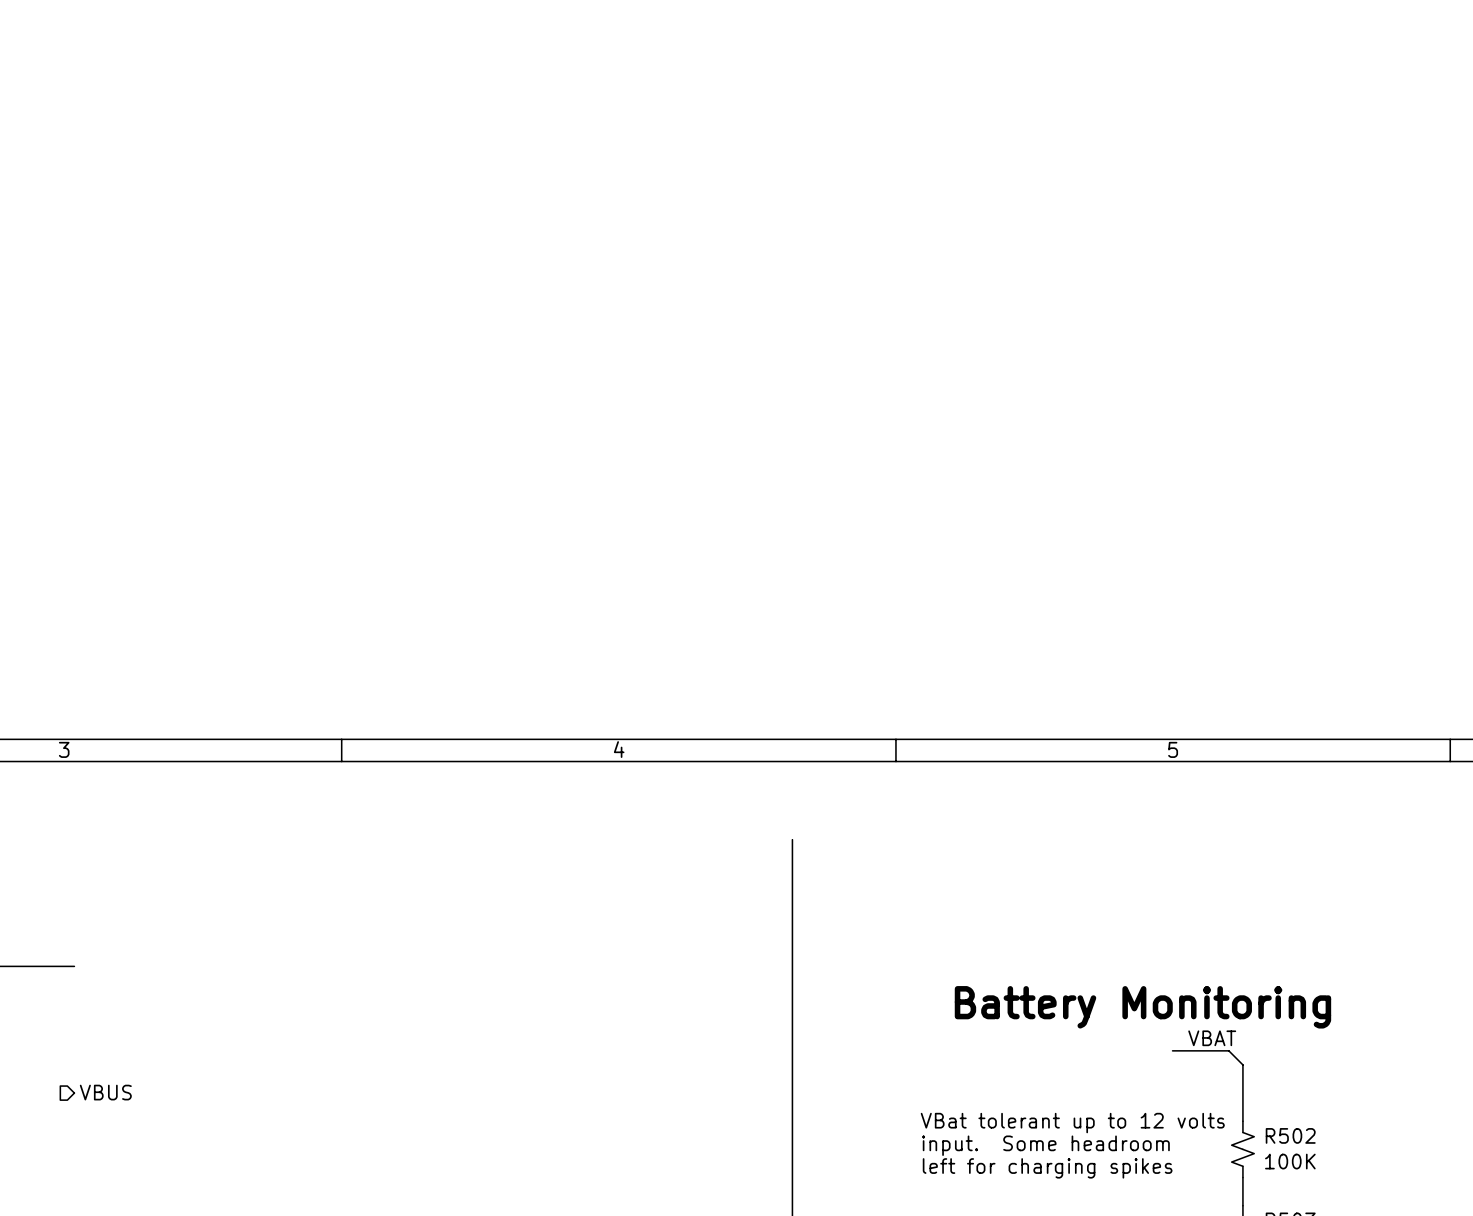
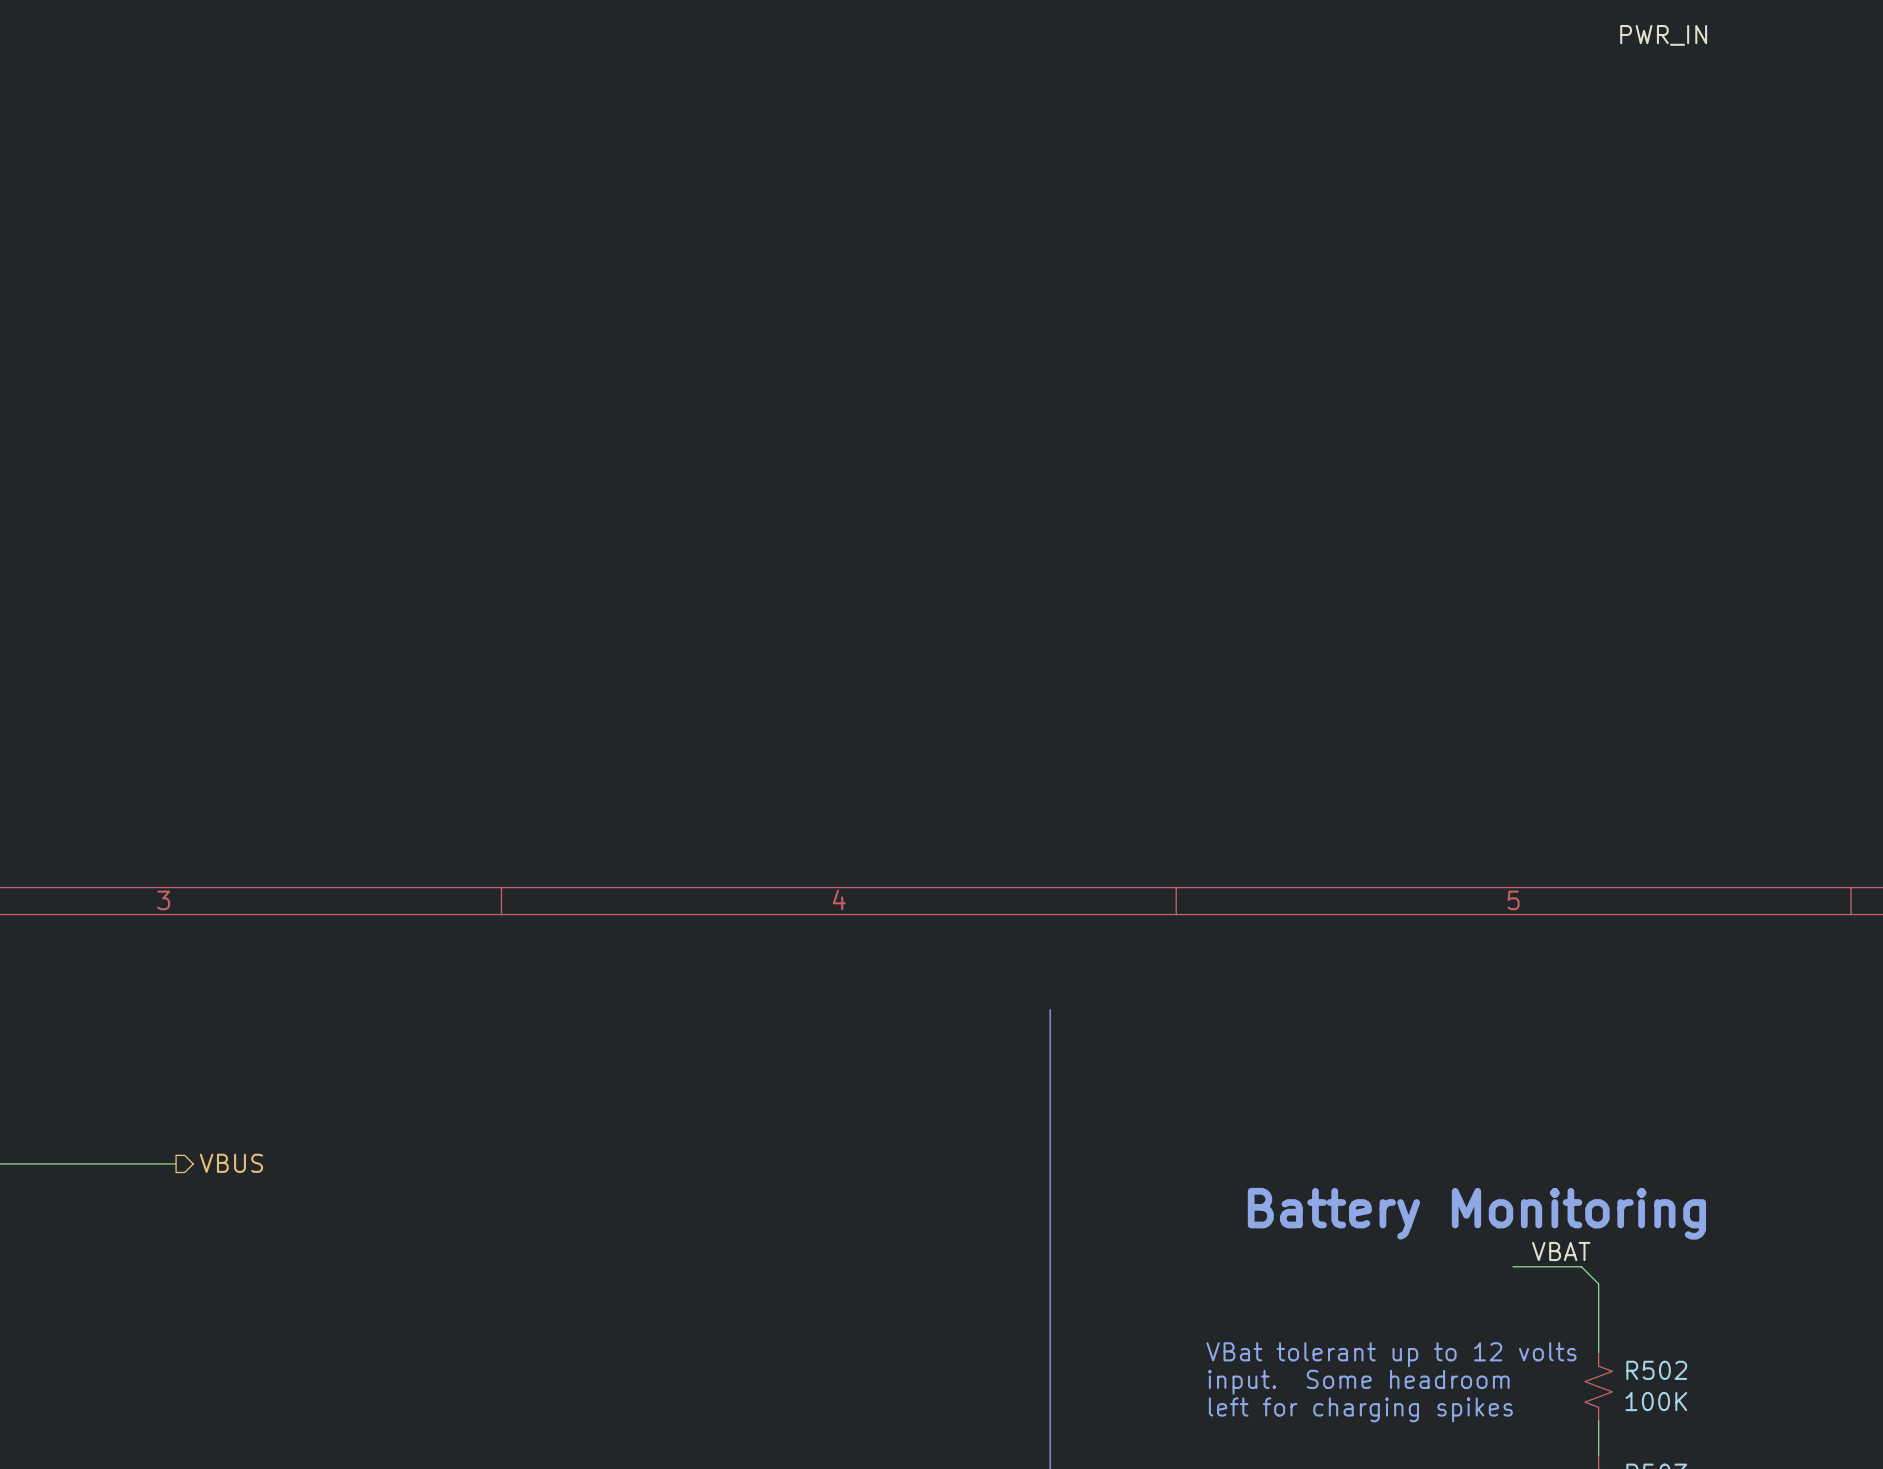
label: none -> PWR_IN (1663, 35)
hierarchical label position: VBUS (105, 1092) -> VBUS (231, 1163)

